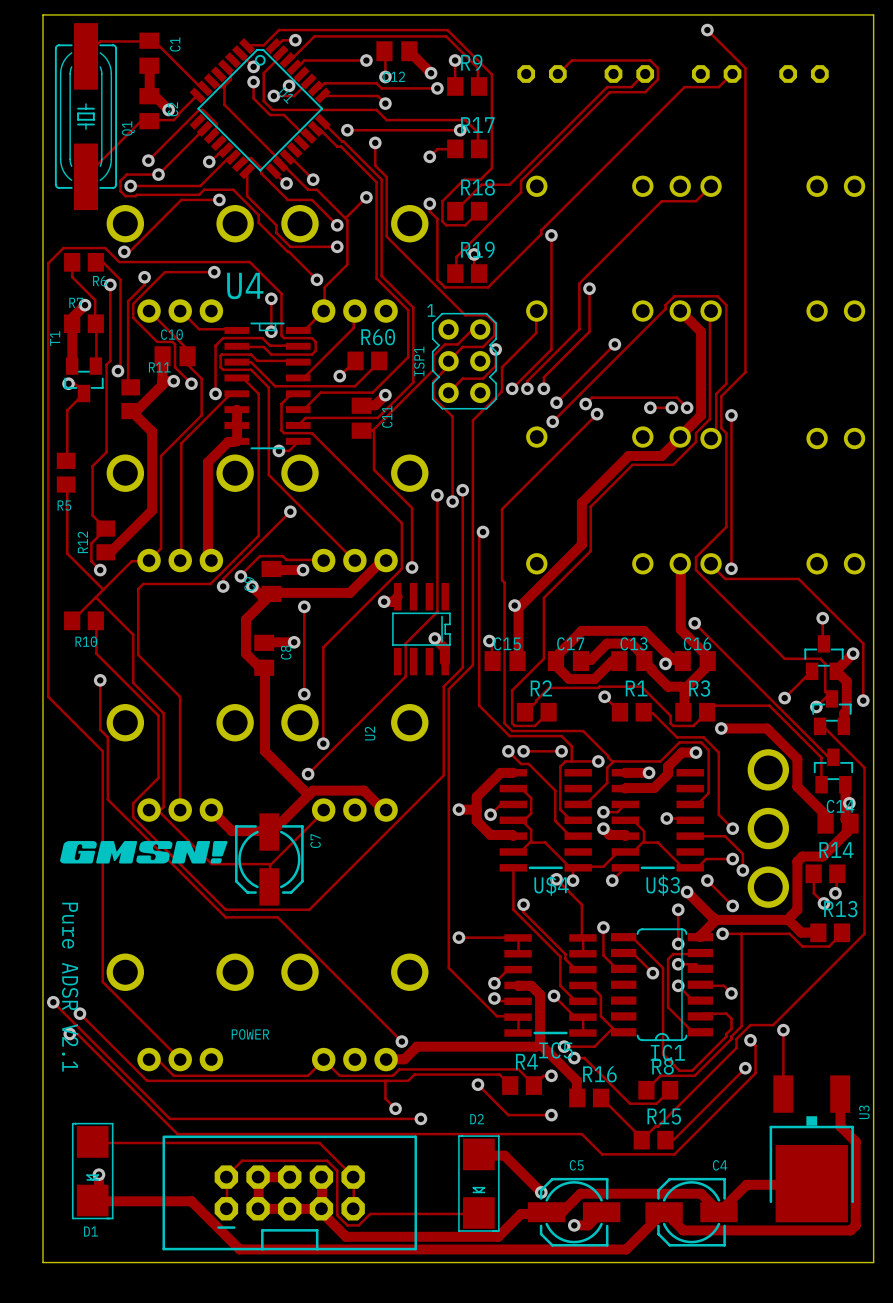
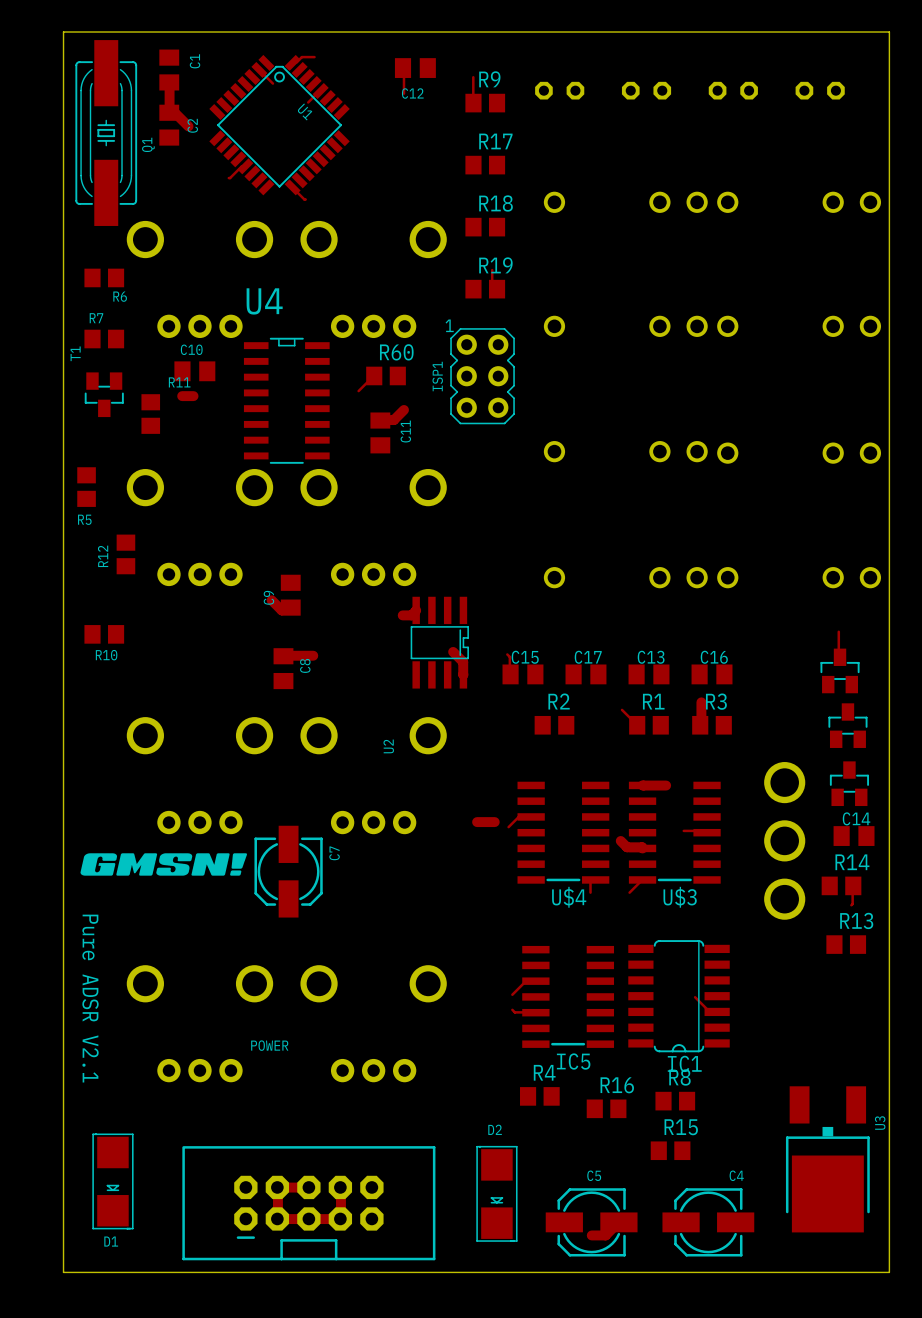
track: (707, 30) (745, 68) (745, 372) (721, 396) (721, 428) (726, 433) (726, 526) (695, 557) (695, 570) (784, 658) (820, 658) (825, 663) (825, 691) (831, 698) (827, 695) (816, 706) -> none
via: (707, 30) -> none
via: (295, 40) -> none
track: (247, 46) (263, 45) (278, 30) (447, 30) (491, 74) (491, 168) (480, 179) (464, 179) (442, 201) (442, 221) (446, 225) (465, 225) (479, 211) -> none
track: (409, 51) (431, 73) -> none
track: (280, 53) (280, 56) (263, 73) (263, 101) (272, 109) (376, 109) (386, 120) (465, 120) (477, 132) (479, 148) -> none
track: (85, 56) (100, 41) (154, 41) (201, 88) (204, 88) -> none
track: (287, 60) (291, 59) (314, 36) (446, 36) (477, 68) (479, 86) -> none
track: (366, 60) (304, 60) (297, 66) (294, 67) -> none
via: (366, 60) -> none
via: (455, 60) -> none
via: (253, 66) -> none
track: (225, 67) (230, 71) (230, 79) (223, 87) (211, 81) -> none
via: (431, 73) -> none
track: (557, 73) (571, 60) (650, 60) (657, 68) (657, 79) (645, 92) (609, 92) (521, 180) (521, 192) (456, 256) (455, 273) -> none
track: (645, 73) (631, 87) (607, 87) (509, 184) (481, 184) (455, 211) -> none
track: (732, 73) (718, 87) (684, 87) (541, 230) (541, 234) (488, 287) (445, 287) (437, 279) (437, 218) (429, 211) (429, 203) -> none
via: (385, 76) -> none
track: (308, 81) (294, 96) (273, 96) -> none
track: (253, 82) (253, 98) (270, 115) (284, 115) (304, 135) (308, 135) -> none
via: (253, 82) -> none
via: (289, 85) -> none
track: (223, 86) (224, 104) (280, 160) (280, 164) (308, 189) (316, 189) (347, 220) (347, 264) (324, 287) (324, 310) (305, 329) (298, 330) -> none
track: (437, 88) (381, 88) (376, 83) (324, 83) (319, 88) (315, 88) -> none
via: (437, 88) -> none
track: (197, 95) (173, 120) (140, 121) (85, 176) -> none
track: (322, 95) (377, 96) (385, 103) -> none
via: (273, 96) -> none
via: (385, 103) -> none
via: (168, 109) -> none
track: (322, 121) (381, 179) (381, 275) (413, 307) (413, 382) (377, 417) (305, 417) (298, 425) -> none
track: (204, 128) (158, 174) (126, 174) (120, 180) (120, 191) (125, 196) (135, 196) (199, 194) (204, 189) (233, 189) (258, 215) (258, 222) (316, 279) -> none
track: (315, 128) (319, 128) (337, 146) (341, 146) (376, 182) (376, 278) (408, 310) (408, 357) (372, 392) (320, 392) (304, 409) (298, 409) -> none
track: (347, 130) (460, 130) -> none
via: (347, 130) -> none
via: (460, 130) -> none
track: (211, 135) (216, 123) (202, 109) (199, 109) (148, 160) -> none
track: (375, 142) (375, 165) (386, 177) (386, 236) (465, 315) (486, 315) (494, 322) (494, 335) (483, 346) (462, 346) (447, 362) (447, 367) (433, 381) (433, 397) (452, 416) (452, 501) -> none
via: (375, 142) -> none
track: (455, 148) (437, 149) (429, 156) -> none
via: (429, 156) -> none
track: (232, 157) (228, 158) (200, 185) (130, 185) -> none
track: (287, 157) (291, 158) (313, 179) -> none
via: (148, 160) -> none
via: (209, 161) -> none
track: (240, 164) (251, 158) (261, 168) (261, 173) (287, 199) (311, 199) (337, 225) -> none
track: (247, 171) (247, 196) (276, 225) (276, 232) (290, 246) (337, 246) -> none
via: (158, 174) -> none
via: (313, 179) -> none
via: (286, 183) -> none
via: (130, 185) -> none
track: (711, 186) (695, 201) (661, 201) (579, 283) (579, 329) (527, 381) (527, 388) -> none
track: (366, 197) (345, 218) -> none
via: (366, 197) -> none
track: (219, 199) (181, 199) (129, 251) (124, 251) -> none
via: (219, 199) -> none
via: (429, 203) -> none
via: (337, 225) -> none
track: (551, 235) (551, 349) (512, 388) -> none
via: (551, 235) -> none
via: (337, 246) -> none
via: (124, 251) -> none
via: (474, 254) -> none
track: (72, 262) (72, 277) (95, 300) (95, 366) -> none
track: (95, 262) (104, 263) (120, 279) (120, 368) (117, 371) -> none
track: (214, 272) (164, 272) (133, 303) (133, 317) (157, 341) (172, 341) (175, 344) (175, 367) (191, 383) -> none
via: (214, 272) -> none
track: (144, 277) (144, 284) (128, 301) (128, 383) (130, 387) -> none
via: (144, 277) -> none
via: (316, 279) -> none
track: (110, 284) (110, 360) (106, 364) (106, 452) (92, 466) (92, 515) (105, 528) (91, 543) (91, 561) (100, 570) -> none
via: (110, 284) -> none
track: (589, 288) (589, 331) (543, 377) (543, 388) -> none
via: (589, 288) -> none
track: (271, 298) (271, 331) -> none
via: (271, 298) -> none
track: (85, 305) (73, 316) (72, 365) -> none
via: (85, 305) -> none
track: (149, 311) (186, 348) (187, 364) (201, 378) (201, 415) (161, 455) (161, 548) (148, 561) (131, 561) (72, 620) -> none
track: (180, 311) (199, 329) (236, 330) -> none
track: (354, 311) (353, 327) (304, 377) (298, 377) -> none
track: (536, 311) (536, 333) (502, 367) (502, 391) (472, 420) (472, 665) (448, 689) (448, 968) (496, 1016) (517, 1016) (518, 1033) -> none
track: (680, 311) (701, 331) (701, 415) (661, 455) (628, 455) (581, 502) (581, 544) (518, 608) -> none
track: (711, 311) (709, 419) (695, 433) (695, 442) (673, 464) (632, 464) (590, 506) (590, 551) (543, 597) (543, 658) (512, 690) (512, 723) (514, 725) (534, 725) (548, 712) -> none
track: (480, 329) (471, 330) (457, 344) (445, 344) (433, 355) (433, 369) (372, 430) (361, 430) -> none
via: (271, 331) -> none
track: (614, 344) (556, 402) -> none
via: (614, 344) -> none
track: (236, 346) (263, 346) (271, 354) (311, 354) (315, 350) (315, 341) (311, 338) (284, 338) (281, 335) (281, 293) (249, 262) (119, 262) (105, 248) (63, 248) (48, 263) (48, 696) (102, 751) (102, 982) (180, 1059) -> none
track: (298, 346) (270, 345) (262, 338) (223, 338) (215, 345) (215, 393) -> none
track: (495, 349) (495, 365) (483, 378) (462, 378) (448, 392) -> none
via: (495, 349) -> none
track: (162, 356) (162, 385) (136, 410) (130, 411) (152, 431) (152, 510) (111, 551) (105, 552) -> none
track: (379, 360) (355, 386) (275, 386) (251, 362) (236, 362) -> none
track: (298, 362) (257, 360) (251, 354) (220, 355) (220, 367) (223, 369) (251, 369) (268, 387) (268, 474) (354, 560) -> none
via: (117, 371) -> none
via: (339, 376) -> none
track: (236, 377) (243, 378) (258, 393) (258, 535) (210, 584) (143, 584) (138, 589) (138, 654) (180, 696) (180, 810) -> none
via: (173, 381) -> none
track: (68, 383) (74, 383) (83, 393) (67, 410) (66, 460) -> none
via: (68, 383) -> none
via: (191, 383) -> none
via: (512, 388) -> none
via: (527, 388) -> none
via: (543, 388) -> none
via: (215, 393) -> none
track: (236, 393) (230, 393) (181, 443) (180, 560) -> none
track: (298, 393) (291, 393) (281, 404) (281, 430) (284, 433) (311, 433) (401, 523) (401, 568) (323, 647) (323, 743) -> none
via: (385, 395) -> none
via: (556, 402) -> none
track: (585, 404) (592, 397) (676, 397) (687, 407) -> none
via: (585, 404) -> none
track: (650, 407) (671, 407) -> none
via: (650, 407) -> none
via: (671, 407) -> none
via: (687, 407) -> none
track: (236, 409) (236, 441) (228, 442) (207, 462) (207, 557) (211, 560) -> none
track: (597, 414) (502, 509) (502, 580) (504, 582) (504, 723) (512, 731) (583, 731) (612, 762) -> none
via: (597, 414) -> none
track: (731, 415) (731, 568) -> none
via: (731, 415) -> none
track: (552, 421) (665, 308) (665, 305) (674, 296) (717, 296) (726, 305) (726, 383) (716, 393) (716, 433) (711, 438) -> none
via: (552, 421) -> none
track: (373, 429) (374, 469) (412, 507) (412, 567) -> none
track: (298, 441) (289, 450) (278, 450) -> none
via: (278, 450) -> none
track: (66, 484) (67, 553) (103, 589) -> none
track: (462, 490) (462, 667) (443, 686) (443, 775) (309, 909) (225, 909) (133, 817) (133, 803) (158, 777) (158, 715) (96, 653) (95, 620) -> none
via: (462, 490) -> none
track: (437, 495) (437, 611) (405, 643) (405, 676) (308, 774) -> none
via: (437, 495) -> none
via: (452, 501) -> none
track: (290, 511) (223, 578) (223, 586) -> none
via: (290, 511) -> none
track: (483, 532) (479, 535) (479, 705) (509, 736) (561, 736) (571, 746) (571, 761) -> none
via: (483, 532) -> none
track: (323, 560) (286, 559) (282, 556) (259, 556) (240, 576) -> none
track: (386, 560) (381, 561) (349, 592) (271, 593) (245, 619) (245, 653) (259, 667) (264, 667) (265, 672) (265, 751) (308, 795) -> none
track: (680, 563) (680, 629) (707, 656) (707, 661) (707, 666) (684, 689) (680, 686) (668, 686) (651, 670) (644, 661) (644, 656) (631, 643) (607, 643) (590, 660) (580, 661) -> none
track: (711, 563) (725, 578) (798, 578) (863, 643) (863, 700) -> none
via: (412, 567) -> none
track: (271, 568) (303, 570) -> none
via: (731, 568) -> none
via: (100, 570) -> none
via: (303, 570) -> none
via: (240, 576) -> none
via: (223, 586) -> none
via: (252, 586) -> none
track: (95, 597) (133, 634) (133, 682) (163, 713) (163, 807) (159, 810) (149, 810) (158, 810) (211, 864) (270, 864) -> none
via: (384, 601) -> none
via: (514, 605) -> none
track: (304, 606) (304, 694) -> none
via: (304, 606) -> none
track: (518, 608) (517, 661) -> none
via: (822, 618) -> none
track: (694, 623) (827, 756) (833, 757) -> none
via: (694, 623) -> none
via: (434, 638) -> none
via: (489, 641) -> none
via: (294, 642) -> none
track: (853, 653) (835, 671) (846, 681) (846, 710) (844, 713) (843, 726) -> none
via: (853, 653) -> none
track: (619, 661) (612, 661) (594, 679) (569, 679) (556, 666) (555, 661) (556, 656) (581, 630) (644, 630) (673, 660) (682, 661) -> none
via: (665, 663) -> none
track: (812, 671) (784, 698) -> none
track: (100, 680) (100, 729) (107, 737) (107, 799) (225, 917) (277, 917) (401, 1041) -> none
via: (100, 680) -> none
via: (304, 694) -> none
via: (604, 696) -> none
via: (784, 698) -> none
via: (863, 700) -> none
via: (816, 706) -> none
track: (524, 712) (548, 687) (641, 686) (670, 715) (670, 723) (673, 725) (693, 725) (713, 705) (769, 705) (821, 757) (821, 784) -> none
track: (643, 712) (652, 713) (676, 737) (703, 737) (718, 752) (718, 814) (732, 828) -> none
track: (820, 726) (823, 727) (864, 767) (864, 933) (773, 1025) (750, 1025) (736, 1039) (736, 1047) (657, 1126) (655, 1126) (642, 1139) -> none
track: (721, 728) (766, 728) (797, 758) (797, 786) (825, 814) (825, 823) -> none
via: (721, 728) -> none
via: (323, 743) -> none
track: (508, 751) (521, 763) (528, 763) (555, 790) (555, 821) (569, 834) (578, 836) -> none
via: (508, 751) -> none
track: (523, 751) (561, 751) -> none
via: (523, 751) -> none
via: (561, 751) -> none
track: (695, 752) (682, 752) (668, 766) (668, 774) (654, 788) (625, 788) -> none
via: (695, 752) -> none
track: (598, 761) (565, 761) (560, 766) (560, 809) (570, 819) (578, 820) -> none
via: (598, 761) -> none
track: (513, 772) (500, 772) (476, 796) (476, 821) (490, 834) (513, 836) -> none
via: (649, 772) -> none
via: (308, 774) -> none
track: (845, 784) (845, 819) (850, 823) (846, 827) (846, 832) (822, 856) (802, 856) (797, 861) (797, 909) (788, 919) -> none
track: (513, 788) (522, 789) (531, 798) (531, 813) (523, 821) (513, 820) (522, 821) (531, 829) (531, 841) (521, 851) (513, 851) -> none
via: (849, 803) -> none
track: (578, 804) (586, 803) (607, 783) (607, 767) (613, 761) (660, 761) (679, 742) (701, 742) (708, 750) (708, 793) (698, 803) (690, 804) -> none
track: (625, 804) (617, 812) (603, 812) -> none
via: (458, 809) -> none
track: (211, 810) (232, 831) (269, 832) (273, 829) (313, 790) (363, 790) (382, 809) (386, 810) -> none
track: (323, 810) (270, 865) (269, 886) -> none
via: (603, 812) -> none
via: (490, 814) -> none
via: (666, 818) -> none
track: (625, 820) (633, 821) (644, 831) (644, 841) (633, 851) (617, 852) (603, 866) (569, 866) (545, 842) (530, 841) -> none
via: (603, 828) -> none
via: (732, 828) -> none
track: (690, 836) (725, 836) (742, 853) (742, 870) -> none
track: (643, 841) (657, 842) (682, 866) (698, 866) (706, 859) (732, 859) -> none
via: (732, 859) -> none
track: (513, 867) (513, 909) (560, 956) (560, 985) (575, 1001) (582, 1001) -> none
via: (742, 870) -> none
track: (813, 873) (813, 893) (823, 903) -> none
track: (556, 879) (581, 904) (582, 953) -> none
via: (556, 879) -> none
via: (573, 880) -> none
via: (612, 880) -> none
track: (707, 880) (732, 905) -> none
via: (707, 880) -> none
track: (687, 892) (716, 919) -> none
via: (687, 892) -> none
via: (835, 893) -> none
via: (823, 903) -> none
track: (523, 904) (523, 912) (565, 954) (565, 959) (575, 969) (582, 969) -> none
via: (523, 904) -> none
via: (732, 905) -> none
track: (678, 909) (678, 943) -> none
via: (678, 909) -> none
track: (716, 919) (788, 919) -> none
track: (716, 919) (700, 937) -> none
track: (788, 919) (801, 932) (818, 932) -> none
track: (603, 927) (603, 955) (616, 968) (623, 968) -> none
via: (603, 927) -> none
track: (842, 932) (829, 946) (802, 946) (789, 933) (722, 933) -> none
via: (722, 933) -> none
track: (741, 933) (741, 1026) (694, 1075) (660, 1075) (646, 1090) -> none
track: (458, 937) (517, 937) (518, 953) -> none
via: (458, 937) -> none
track: (623, 937) (632, 937) (663, 968) (663, 1054) (679, 1070) (692, 1070) (726, 1036) (731, 1028) (731, 1018) (726, 1013) (703, 1013) (700, 1016) -> none
via: (678, 943) -> none
track: (623, 953) (633, 954) (652, 973) -> none
track: (700, 953) (673, 954) (668, 959) (668, 1007) (692, 1031) (700, 1032) -> none
track: (678, 964) (695, 964) (700, 968) -> none
via: (678, 964) -> none
via: (652, 973) -> none
via: (494, 983) -> none
track: (700, 984) (723, 985) (731, 993) -> none
track: (518, 985) (531, 985) (540, 994) (540, 1044) -> none
track: (582, 985) (590, 985) (600, 995) (600, 1016) (616, 1031) (623, 1032) (612, 1028) (594, 1046) (564, 1046) -> none
via: (678, 985) -> none
via: (731, 993) -> none
track: (554, 995) (574, 1016) (582, 1017) (582, 1033) -> none
via: (554, 995) -> none
via: (494, 998) -> none
track: (53, 1002) (169, 1118) (420, 1118) -> none
via: (53, 1002) -> none
track: (79, 1013) (147, 1080) (408, 1080) (414, 1074) (499, 1074) (510, 1085) -> none
via: (79, 1013) -> none
track: (783, 1030) (783, 1094) -> none
via: (783, 1030) -> none
track: (69, 1033) (77, 1033) (177, 1134) (581, 1134) (602, 1154) (674, 1154) (755, 1073) (755, 1045) (750, 1040) -> none
via: (69, 1033) -> none
via: (750, 1040) -> none
via: (401, 1041) -> none
track: (540, 1044) (576, 1080) (577, 1098) -> none
track: (540, 1044) (536, 1046) (417, 1046) (404, 1059) (386, 1059) -> none
via: (564, 1046) -> none
track: (574, 1058) (584, 1058) (630, 1103) (656, 1103) (670, 1090) -> none
via: (574, 1058) -> none
track: (149, 1059) (158, 1060) (173, 1075) (308, 1075) (323, 1059) (339, 1075) (393, 1075) (399, 1069) (518, 1069) (533, 1085) (543, 1075) (551, 1075) -> none
track: (745, 1068) (674, 1139) (665, 1140) -> none
via: (745, 1068) -> none
via: (551, 1075) -> none
track: (385, 1080) (385, 1098) (395, 1108) -> none
track: (477, 1084) (508, 1115) (551, 1115) -> none
via: (477, 1084) -> none
track: (840, 1094) (840, 1126) (855, 1141) (855, 1225) (850, 1230) (683, 1230) (664, 1212) (626, 1249) (239, 1249) (191, 1201) (93, 1201) (98, 1197) (98, 1174) -> none
track: (601, 1098) (642, 1139) -> none
via: (395, 1108) -> none
via: (551, 1115) -> none
via: (420, 1118) -> none
track: (92, 1141) (319, 1142) (353, 1177) (353, 1208) -> none
track: (478, 1154) (504, 1155) (541, 1192) -> none
via: (98, 1174) -> none
track: (811, 1183) (746, 1184) (718, 1212) (701, 1193) (580, 1193) (562, 1211) (521, 1213) (498, 1236) (346, 1236) (322, 1212) (321, 1208) -> none
via: (541, 1192) -> none
track: (226, 1208) (226, 1177) (242, 1160) (327, 1160) (337, 1170) (337, 1215) (347, 1225) (358, 1225) (370, 1213) (478, 1213) -> none
via: (574, 1225) -> none

